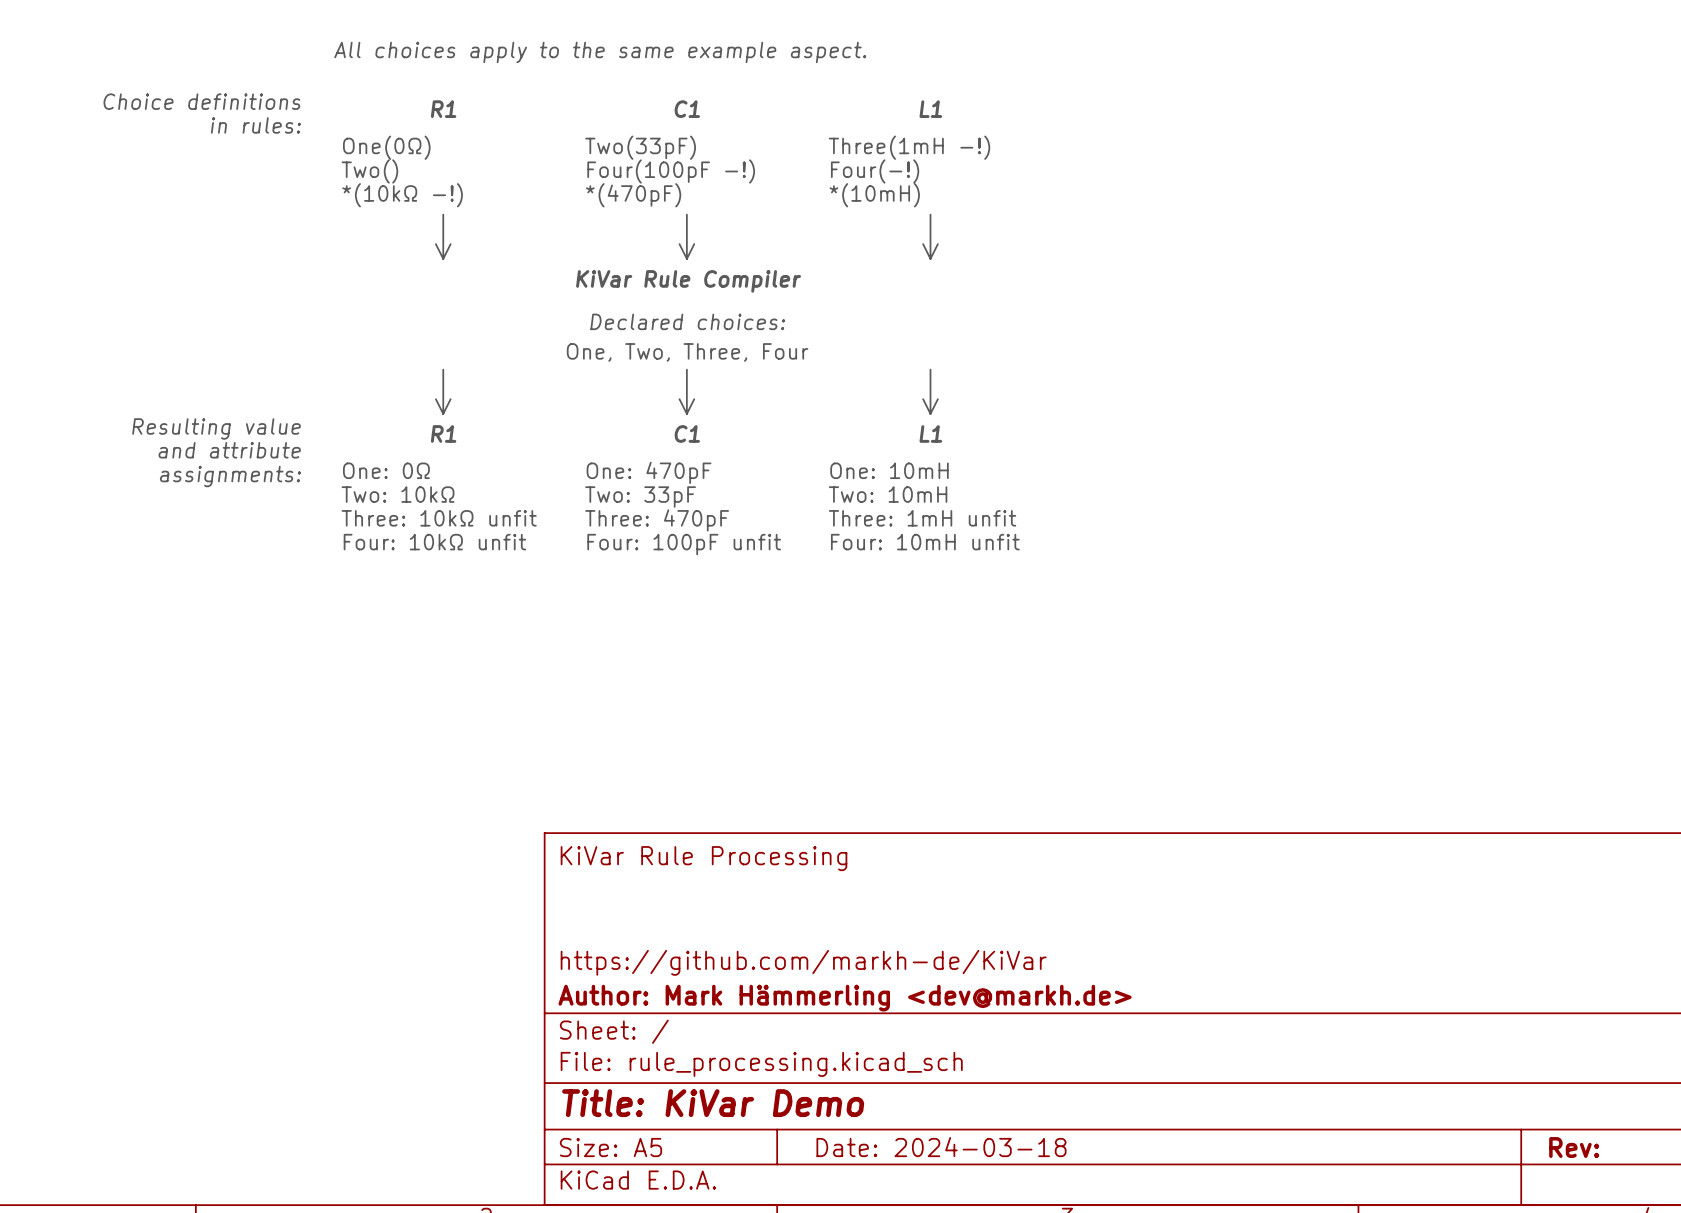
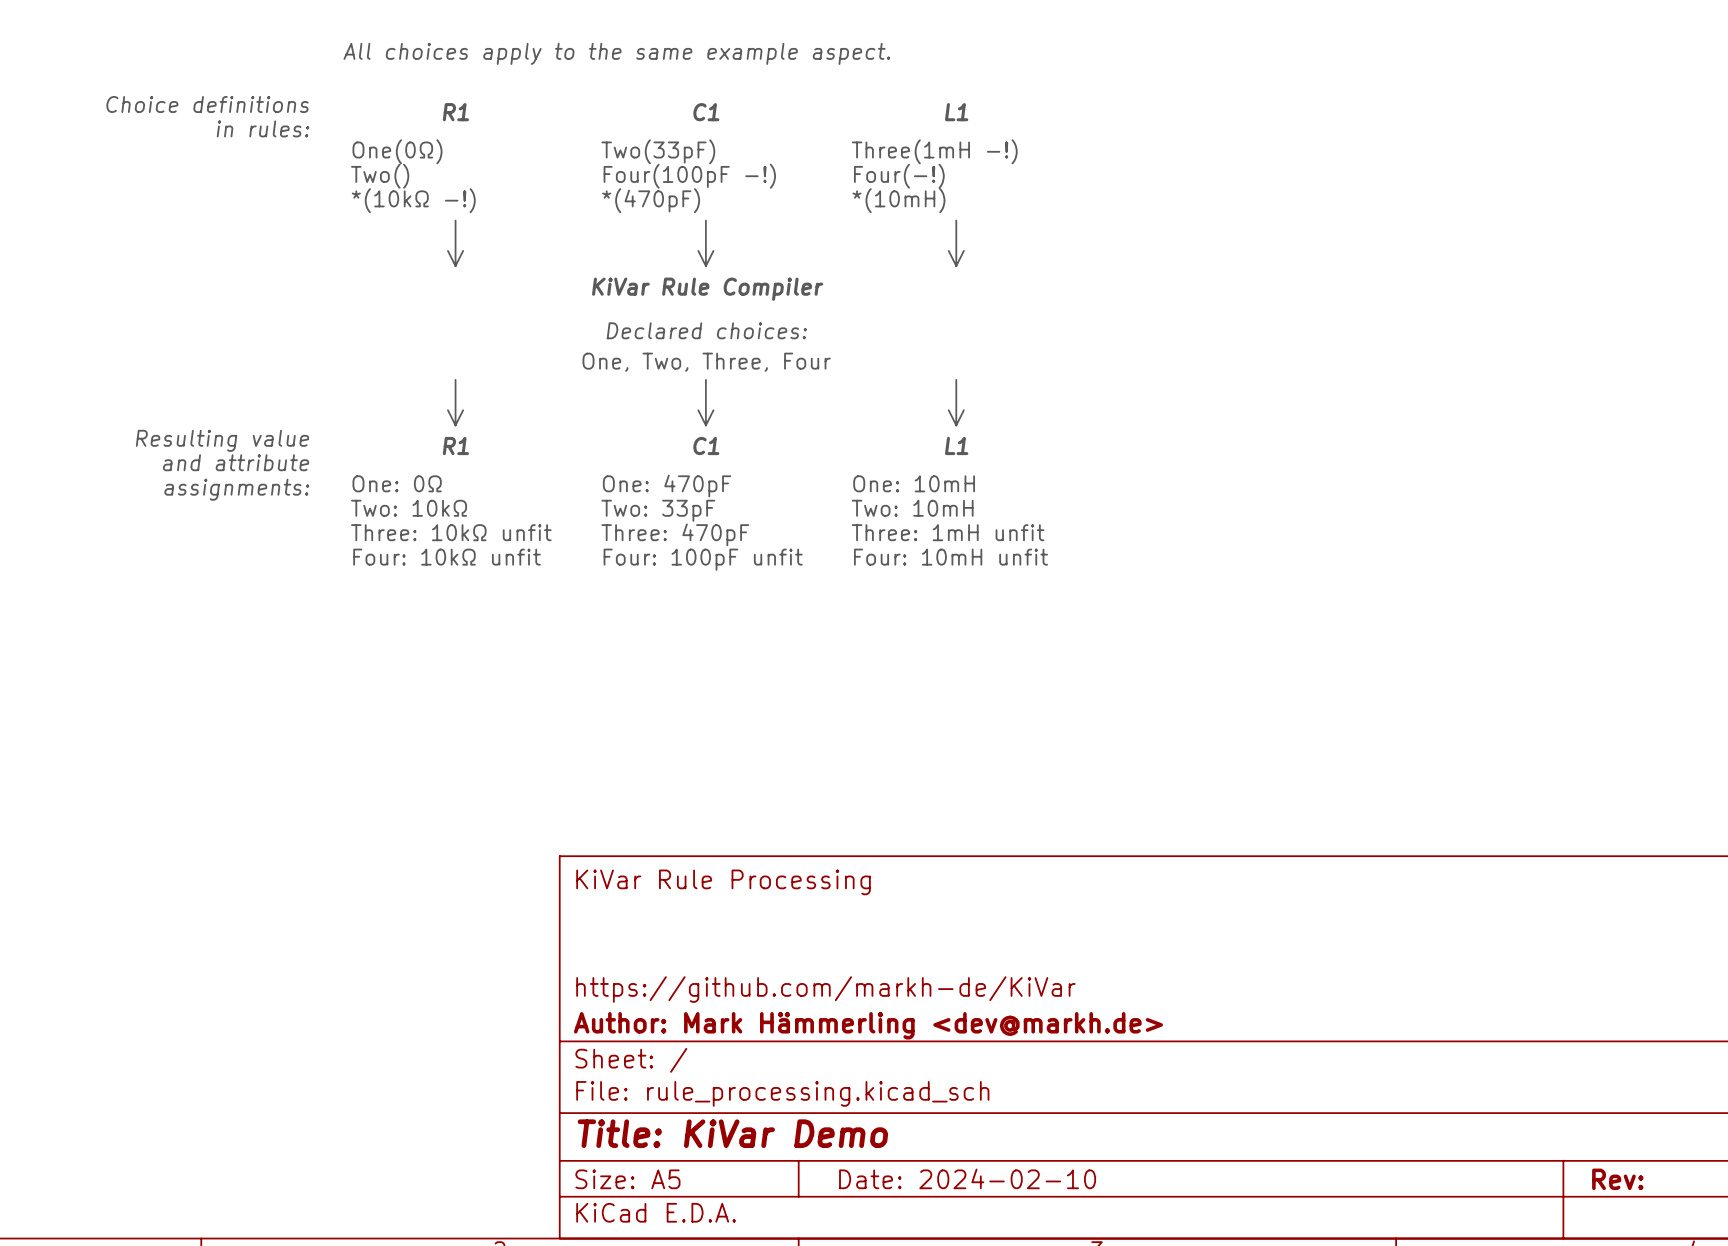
title block: Date: 2024-03-18 (941, 1147) -> Date: 2024-02-10 (967, 1178)

